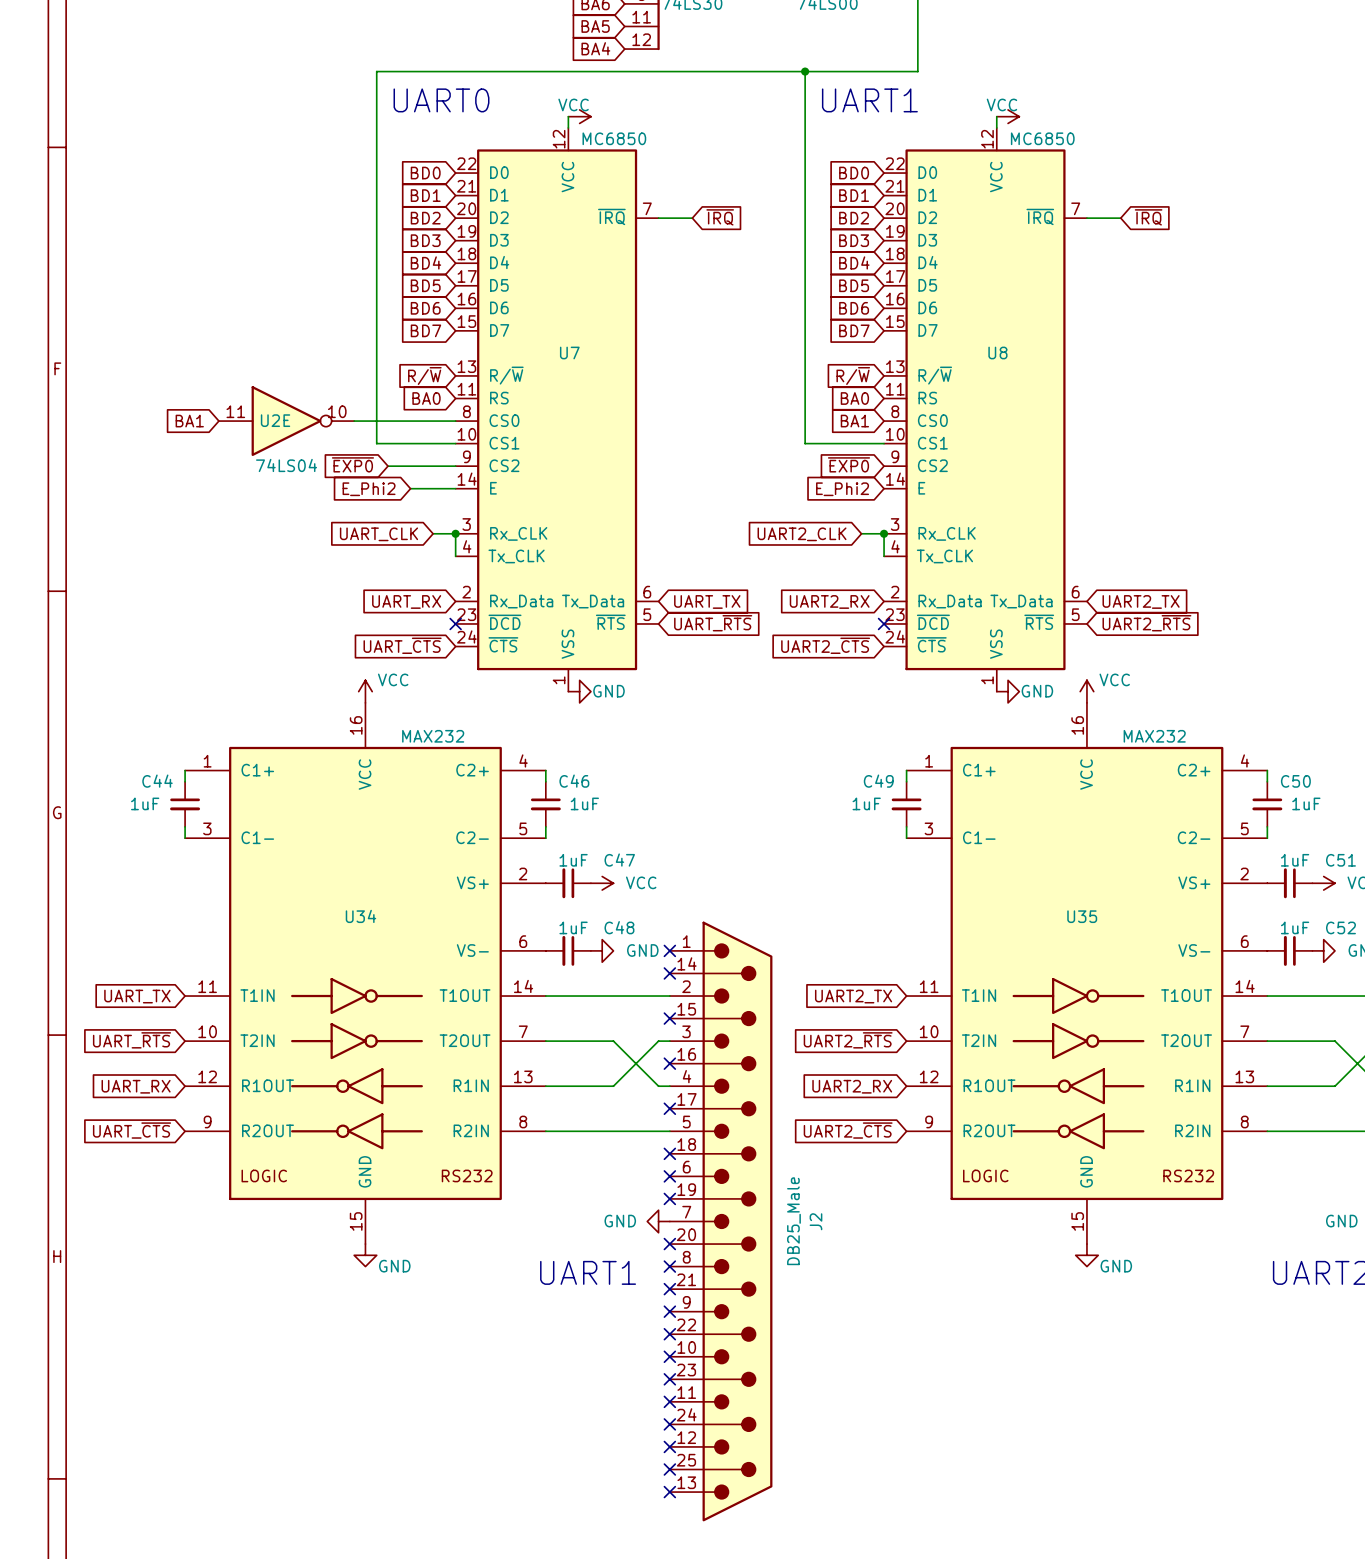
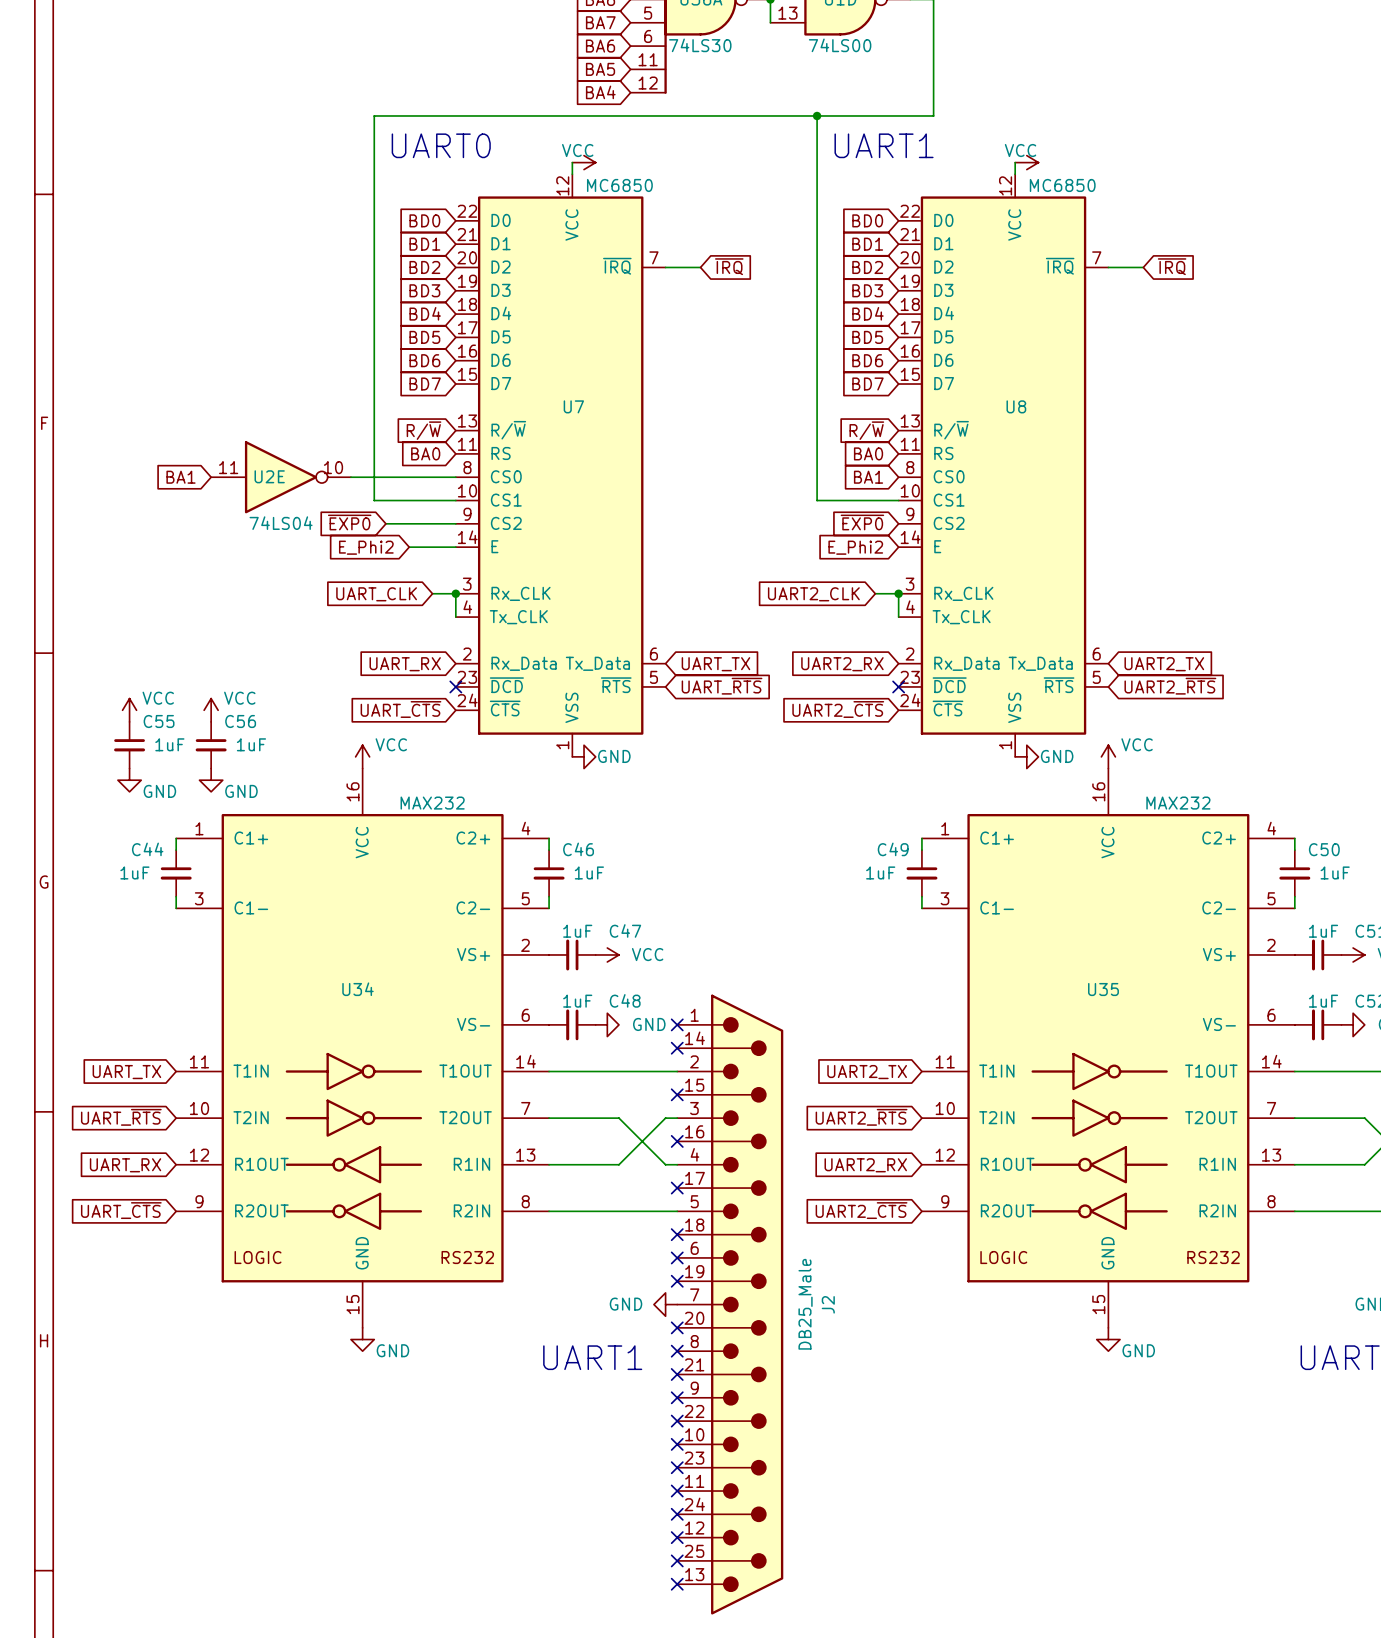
power symbol: none -> VCC (129, 710)
power symbol: none -> VCC (211, 710)
C55: none -> 1uF (129, 745)
C56: none -> 1uF (211, 745)
power symbol: none -> GND (129, 780)
power symbol: none -> GND (211, 780)

